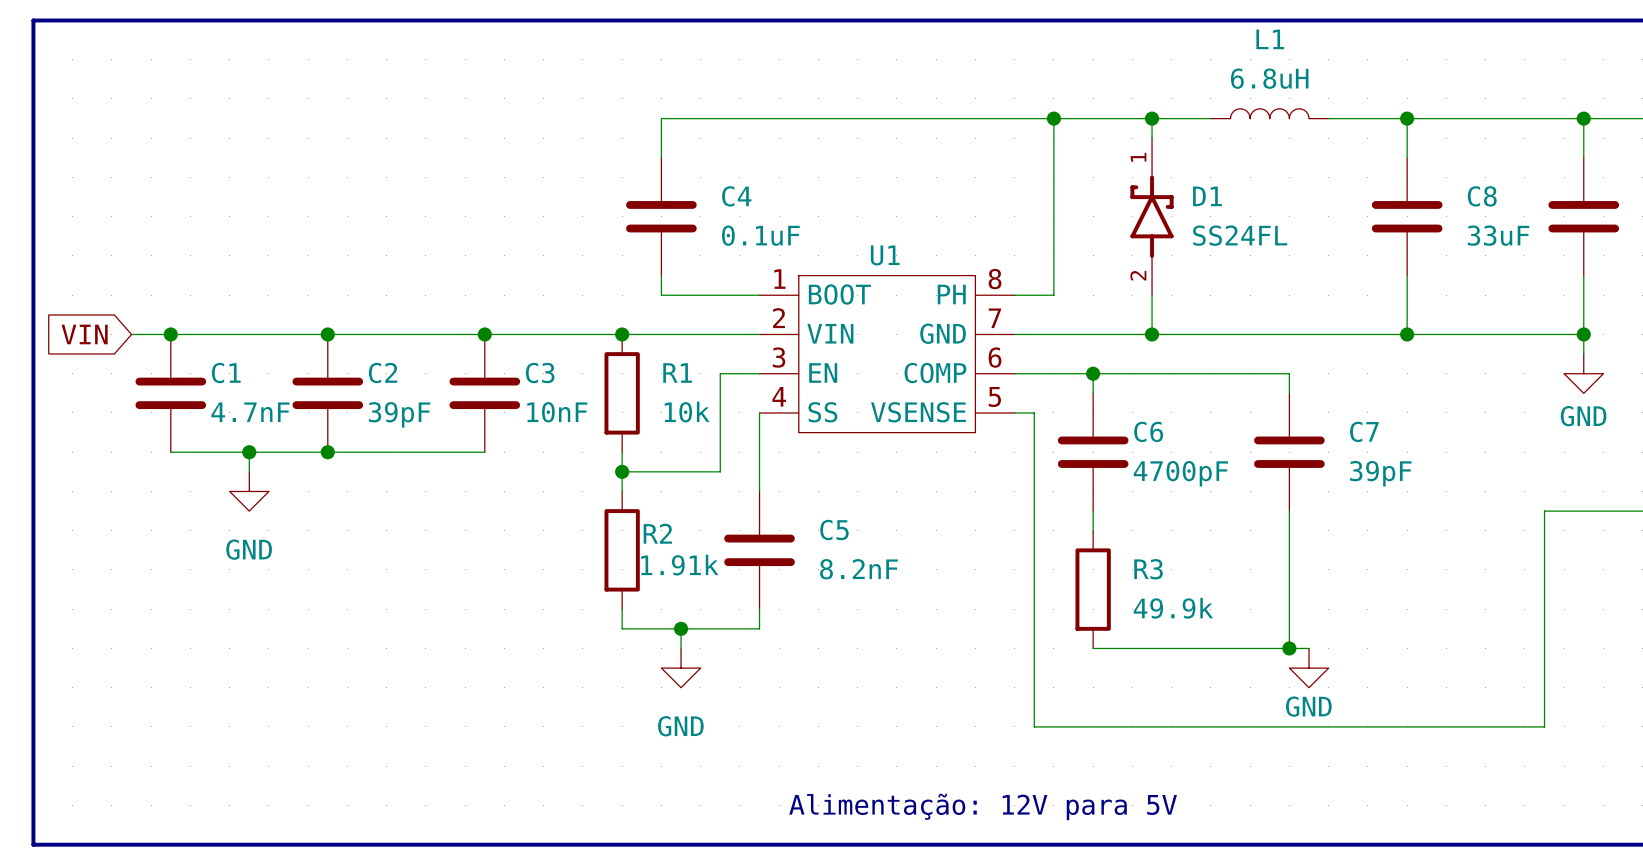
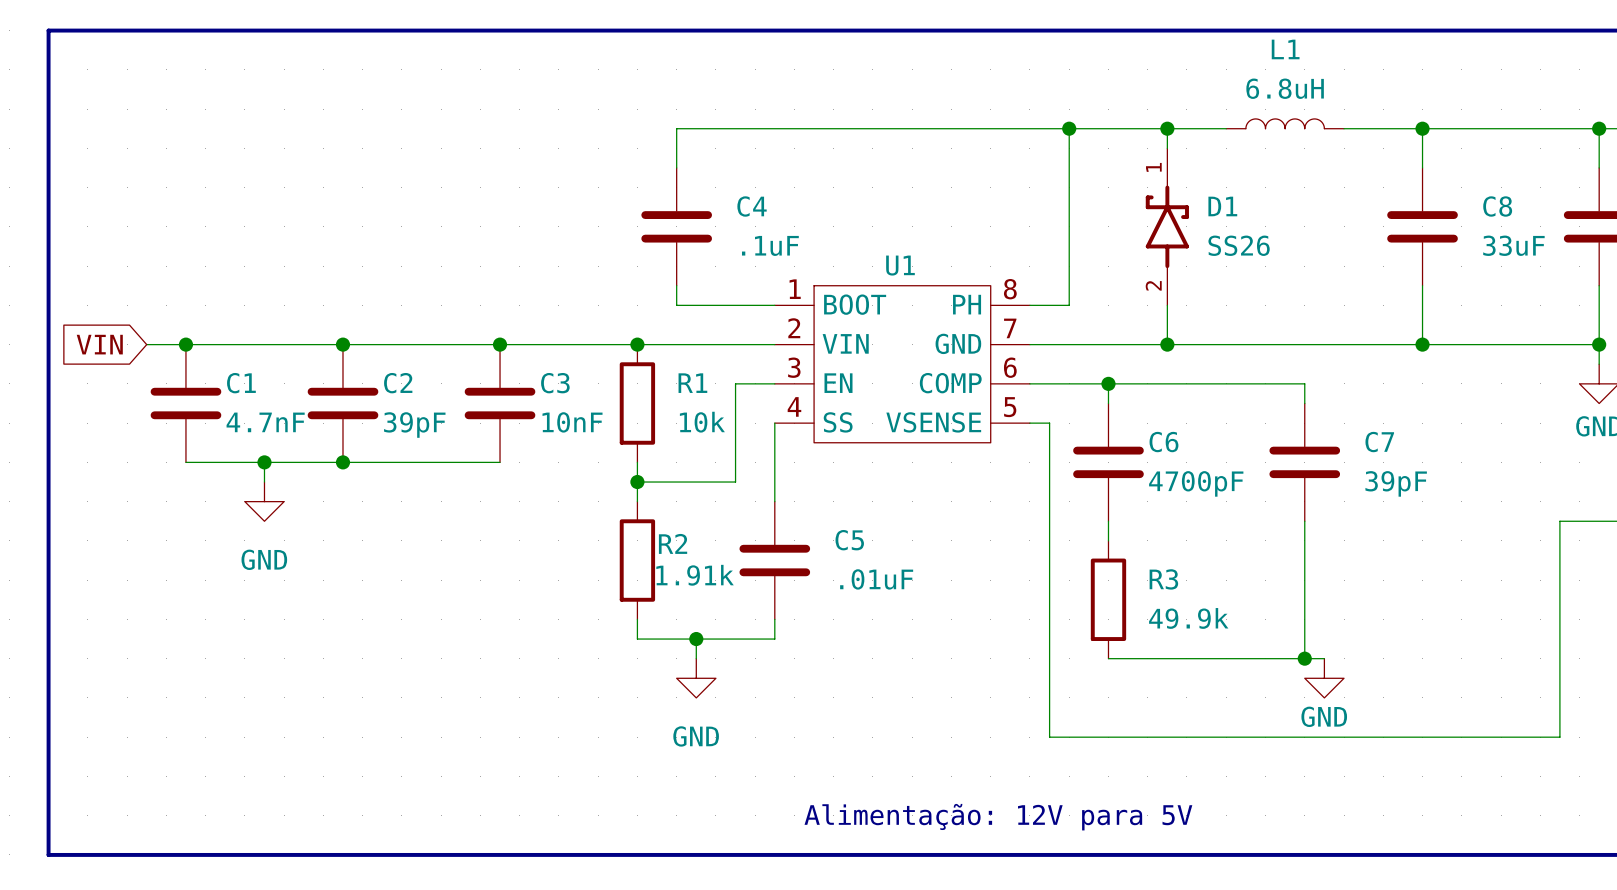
C4 value: 0.1uF (760, 235) -> .1uF (770, 245)
D1 value: SS24FL (1240, 235) -> SS26 (1239, 245)
C5 value: 8.2nF (858, 569) -> .01uF (876, 579)

